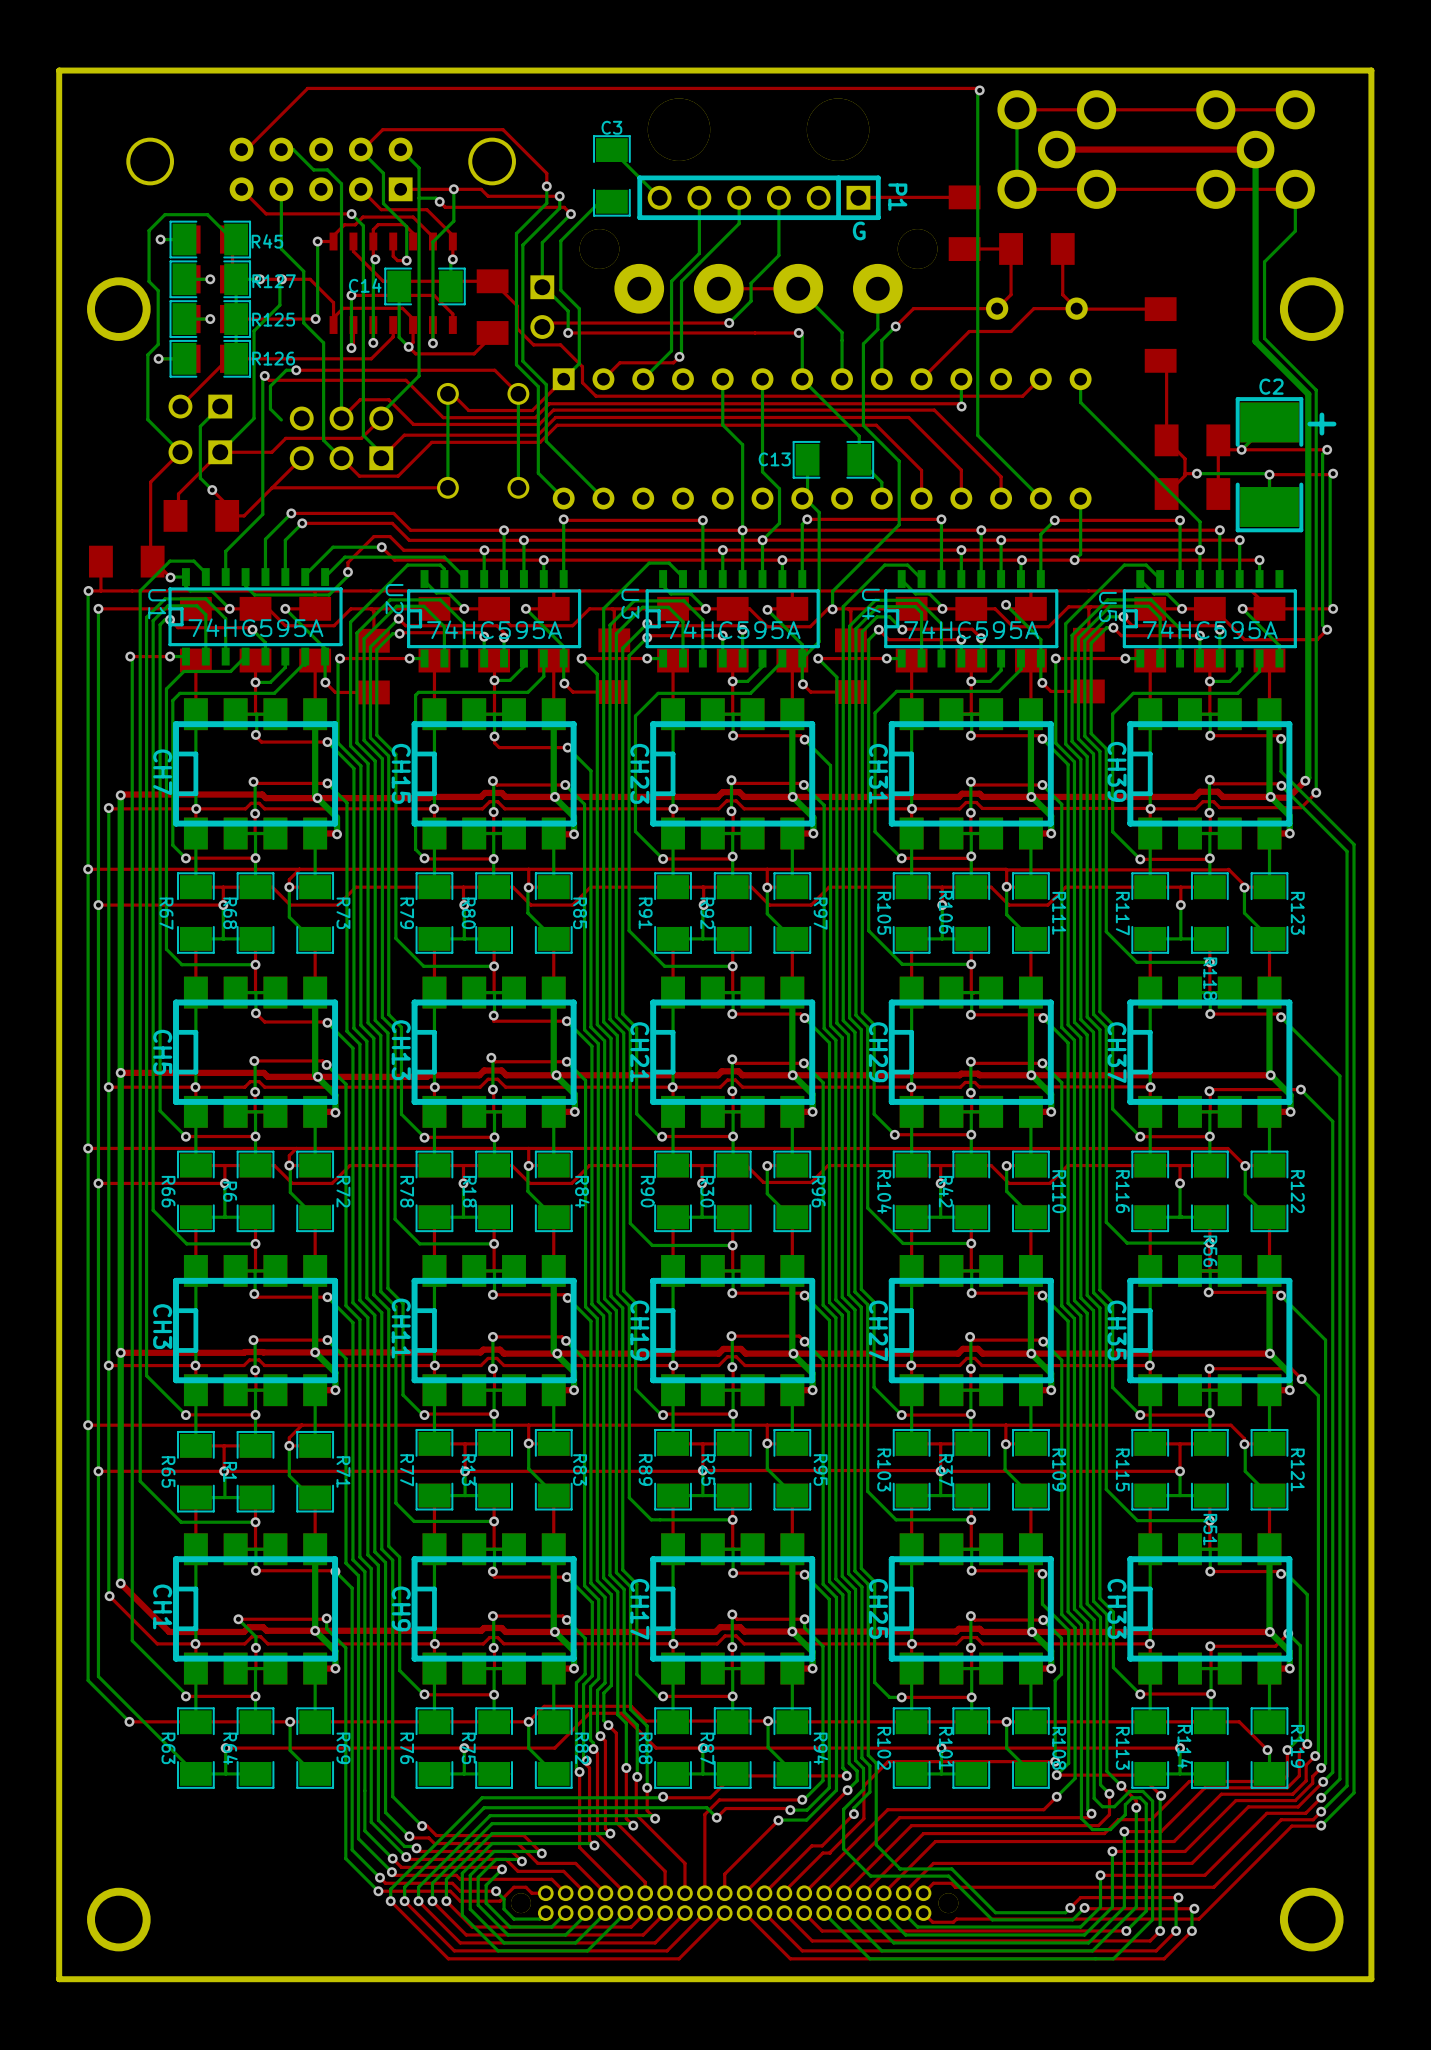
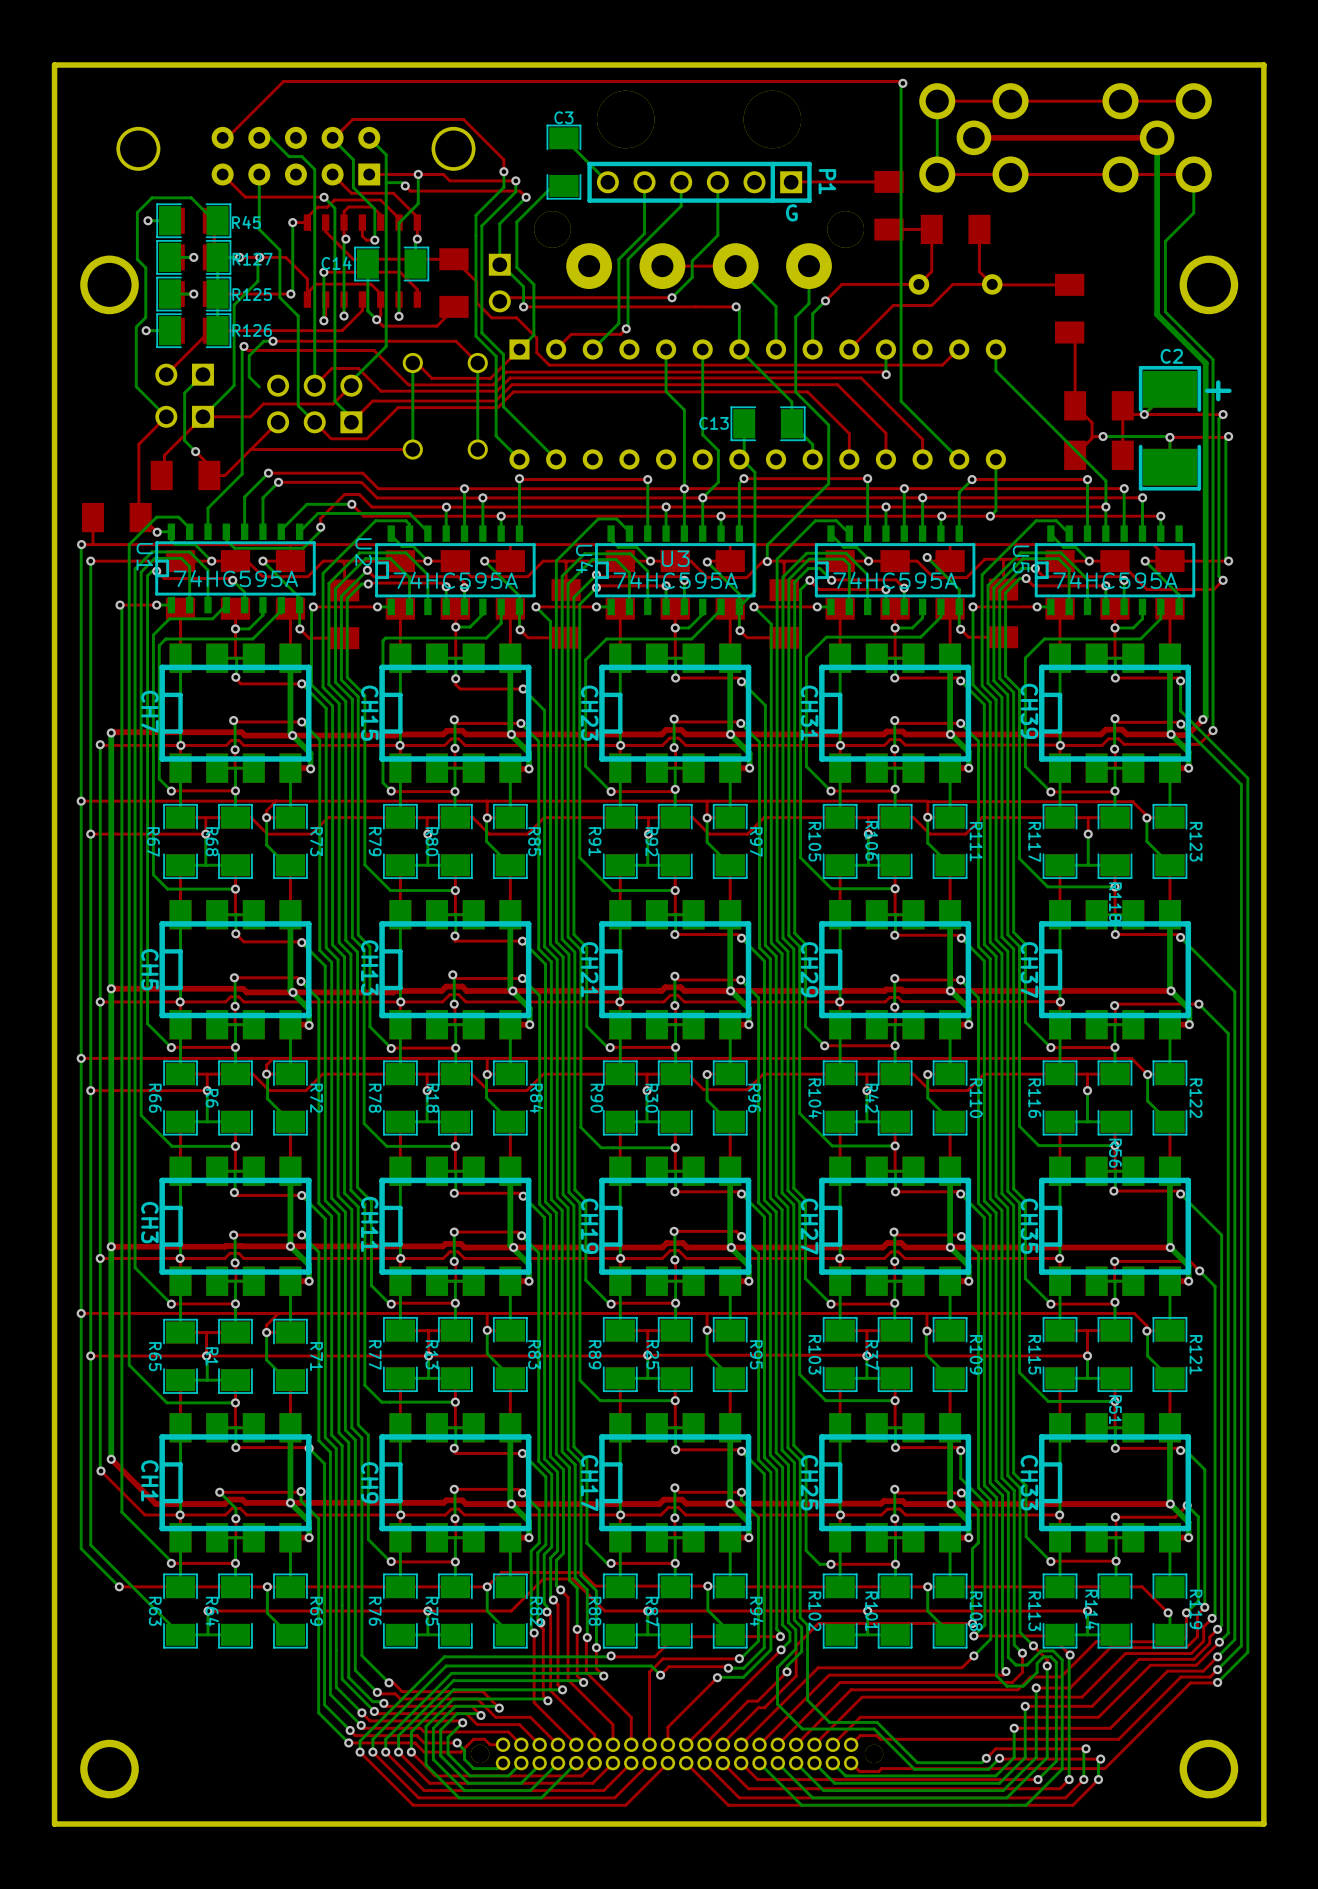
U3 name rotation: 0° (630, 603) -> 90° counterclockwise (675, 558)
U3 name position: U3 (630, 603) -> U3 (675, 558)
U4 name position: U4 (871, 604) -> U4 (584, 559)

